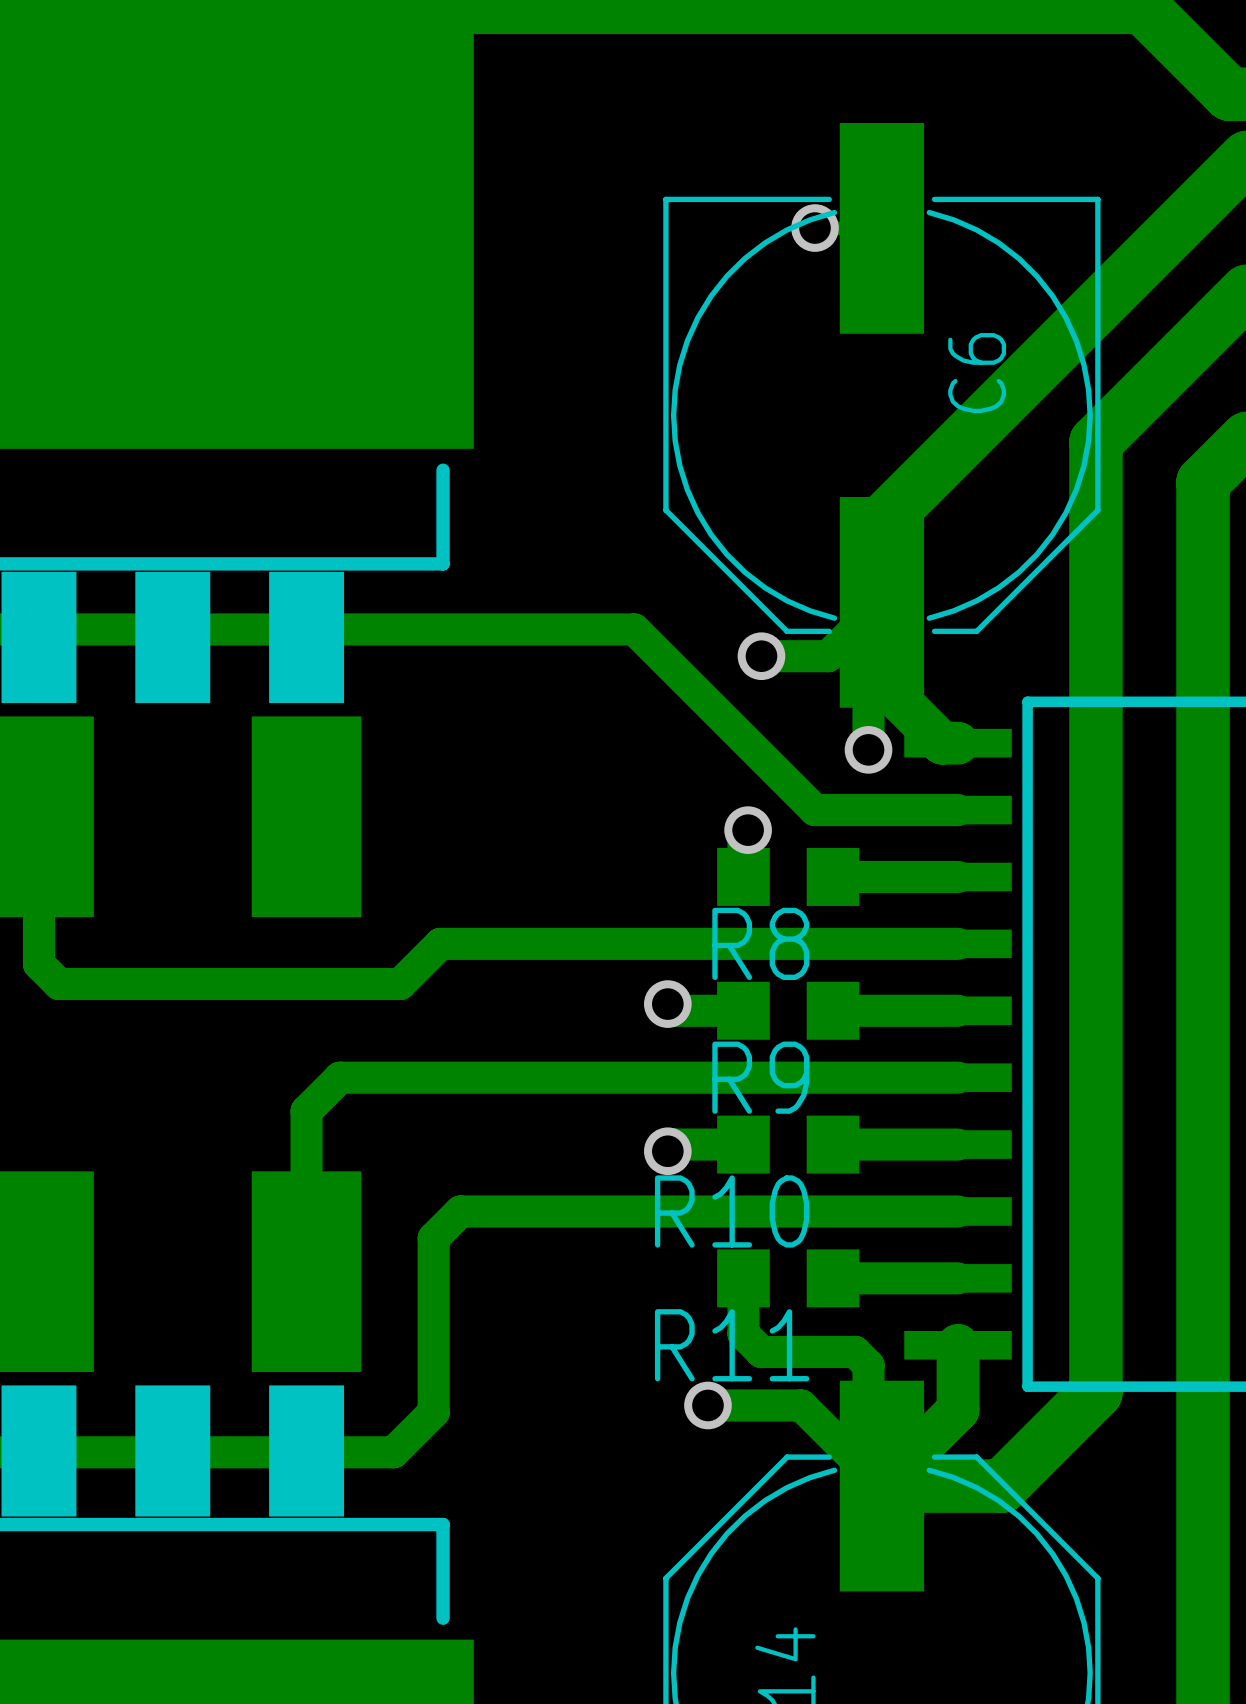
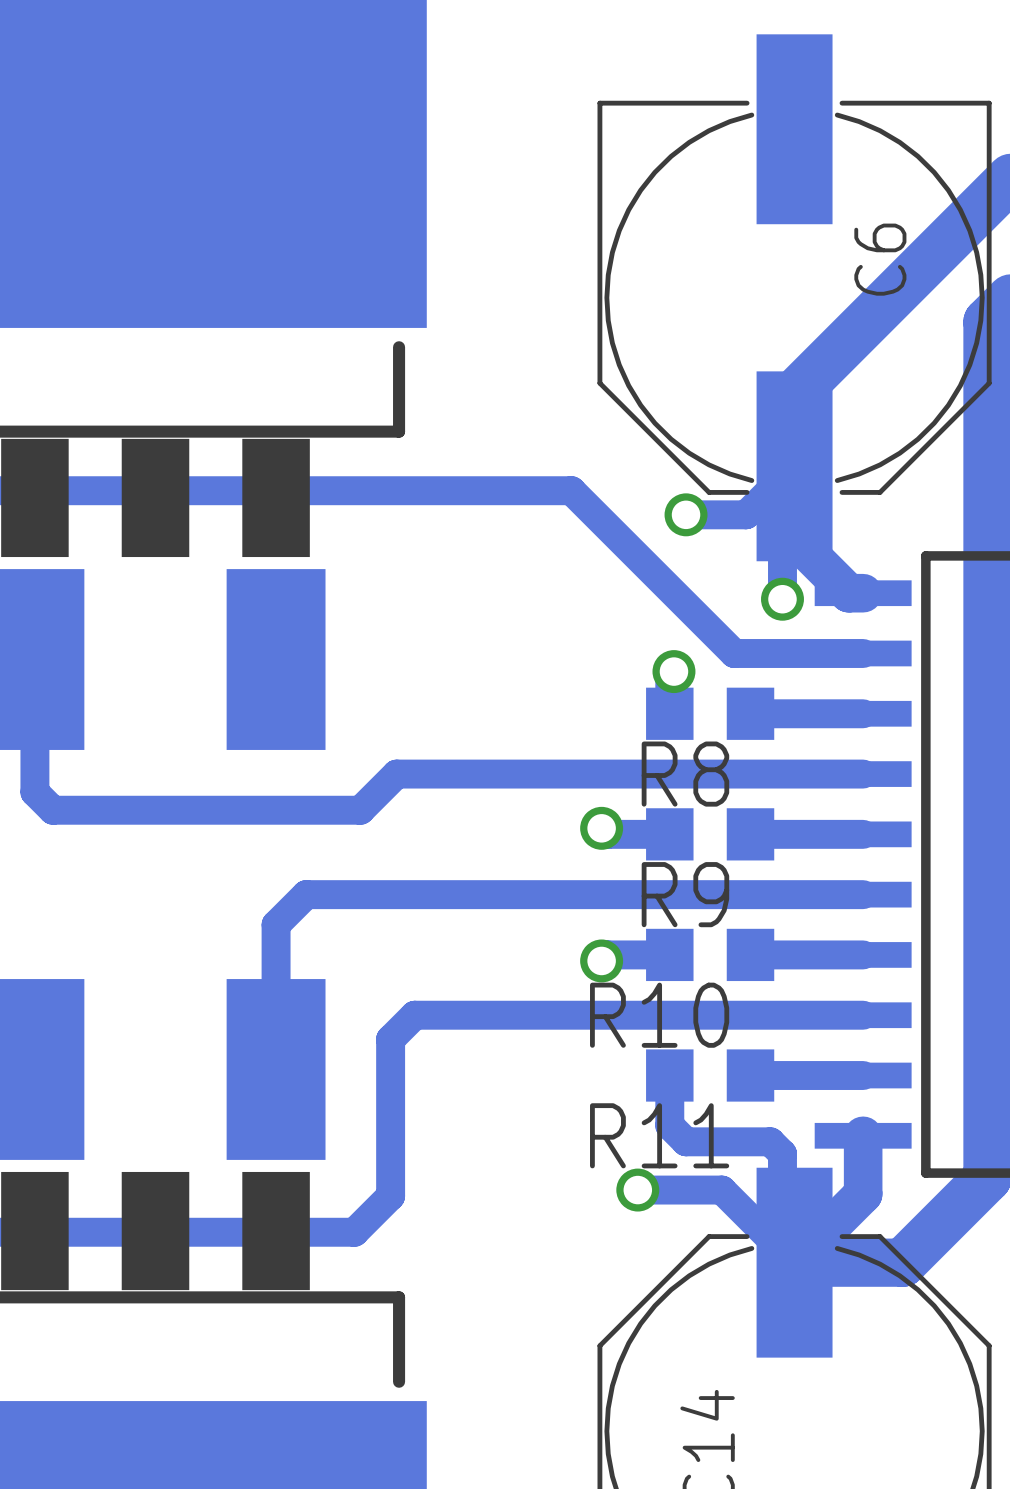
via: (815, 228) -> none

